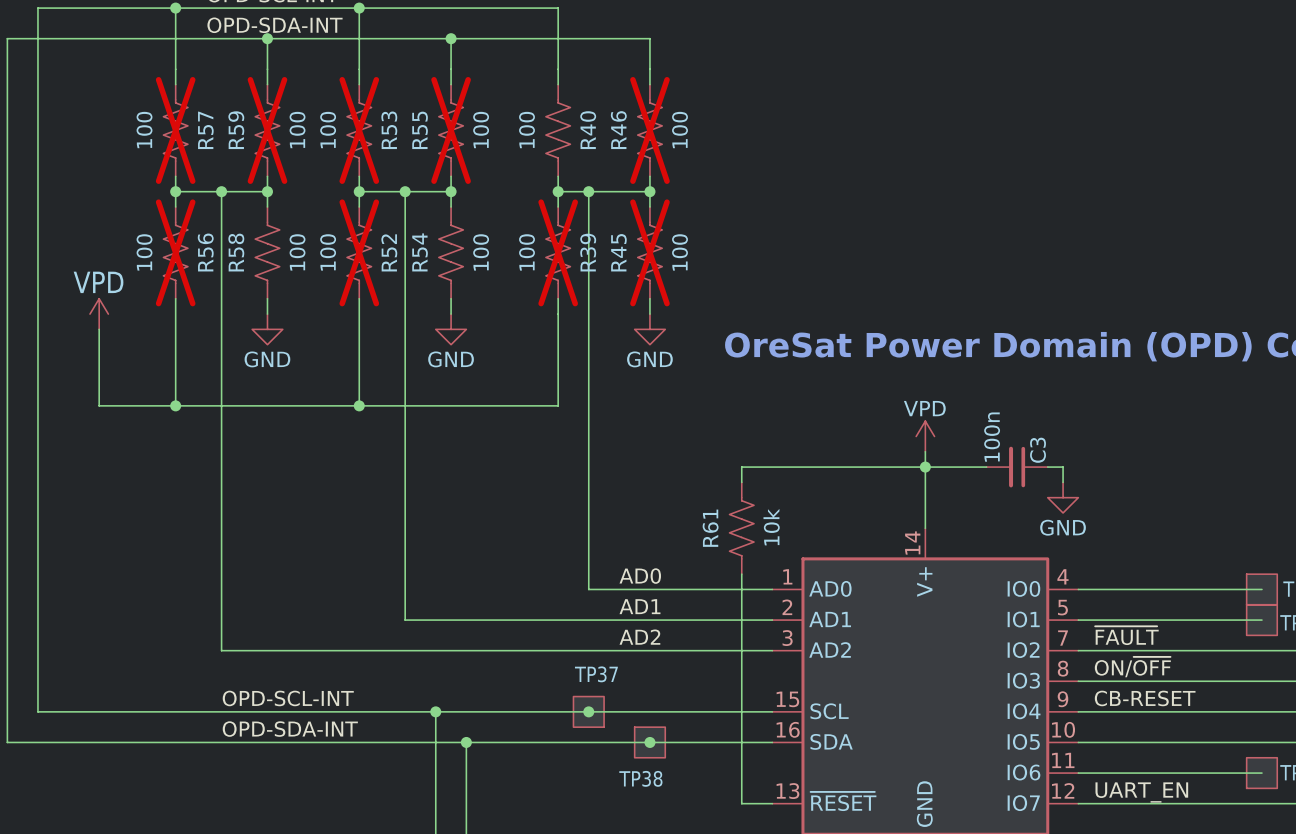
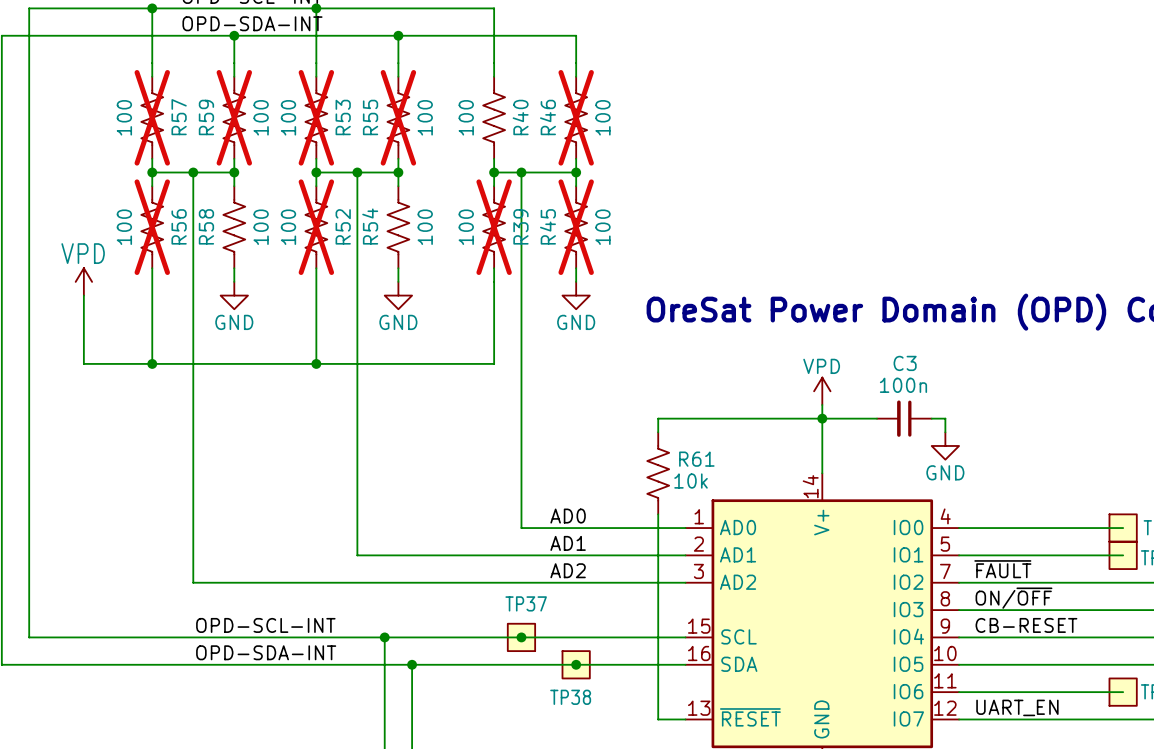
C3 value rotation: 0° (992, 437) -> 90° clockwise (903, 385)
C3 name rotation: 0° (1038, 450) -> 90° clockwise (905, 363)
C3 name position: C3 (1038, 450) -> C3 (905, 363)
R61 value rotation: 0° (771, 527) -> 90° clockwise (691, 481)
R61 name rotation: 0° (710, 528) -> 90° clockwise (696, 459)
R61 name position: R61 (710, 528) -> R61 (696, 459)

